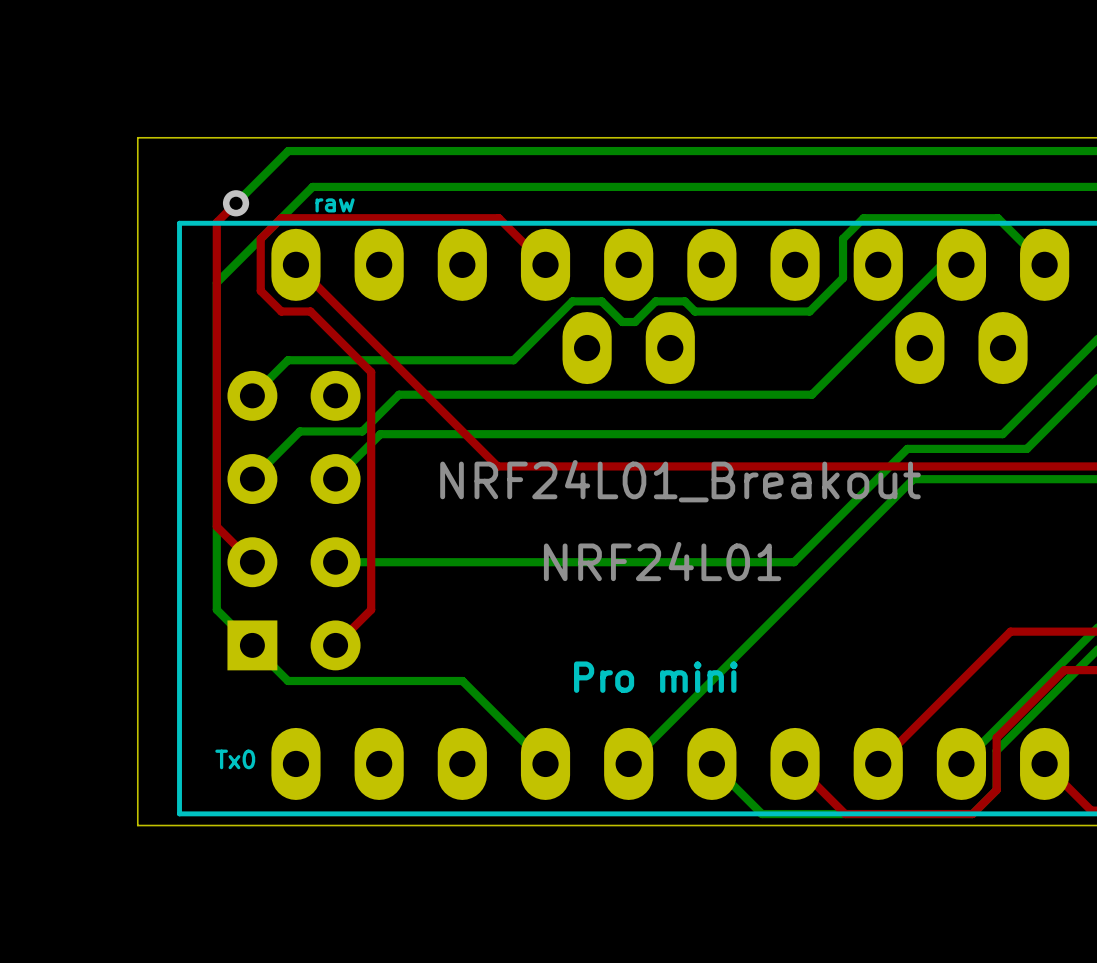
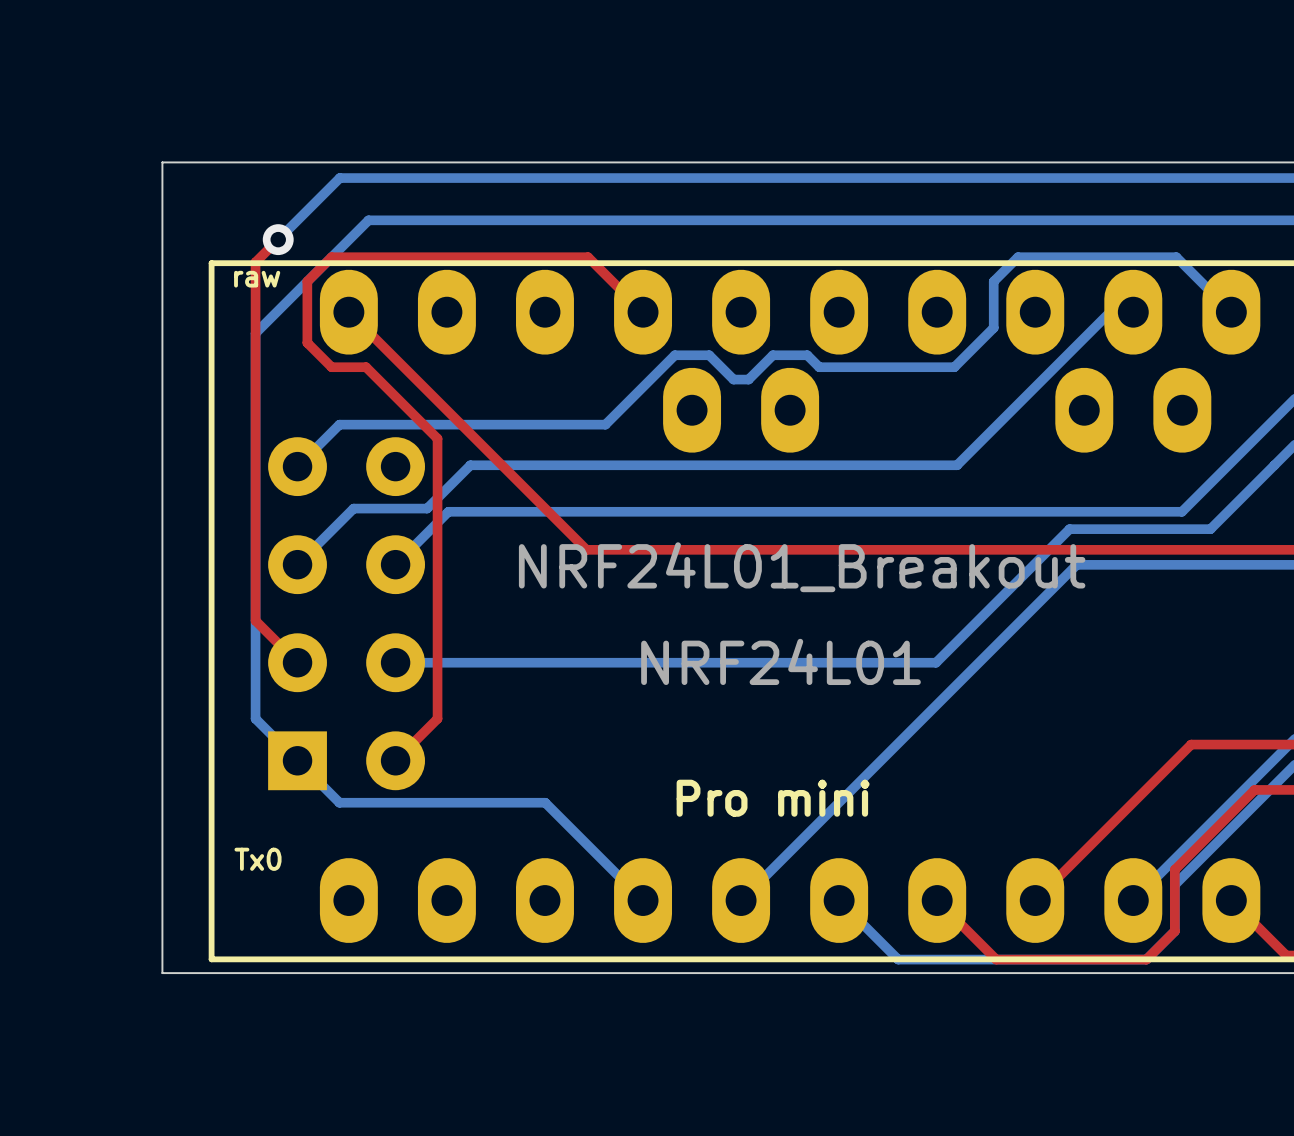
text position: raw (335, 205) -> raw (257, 279)
text position: Tx0 (235, 759) -> Tx0 (258, 859)

